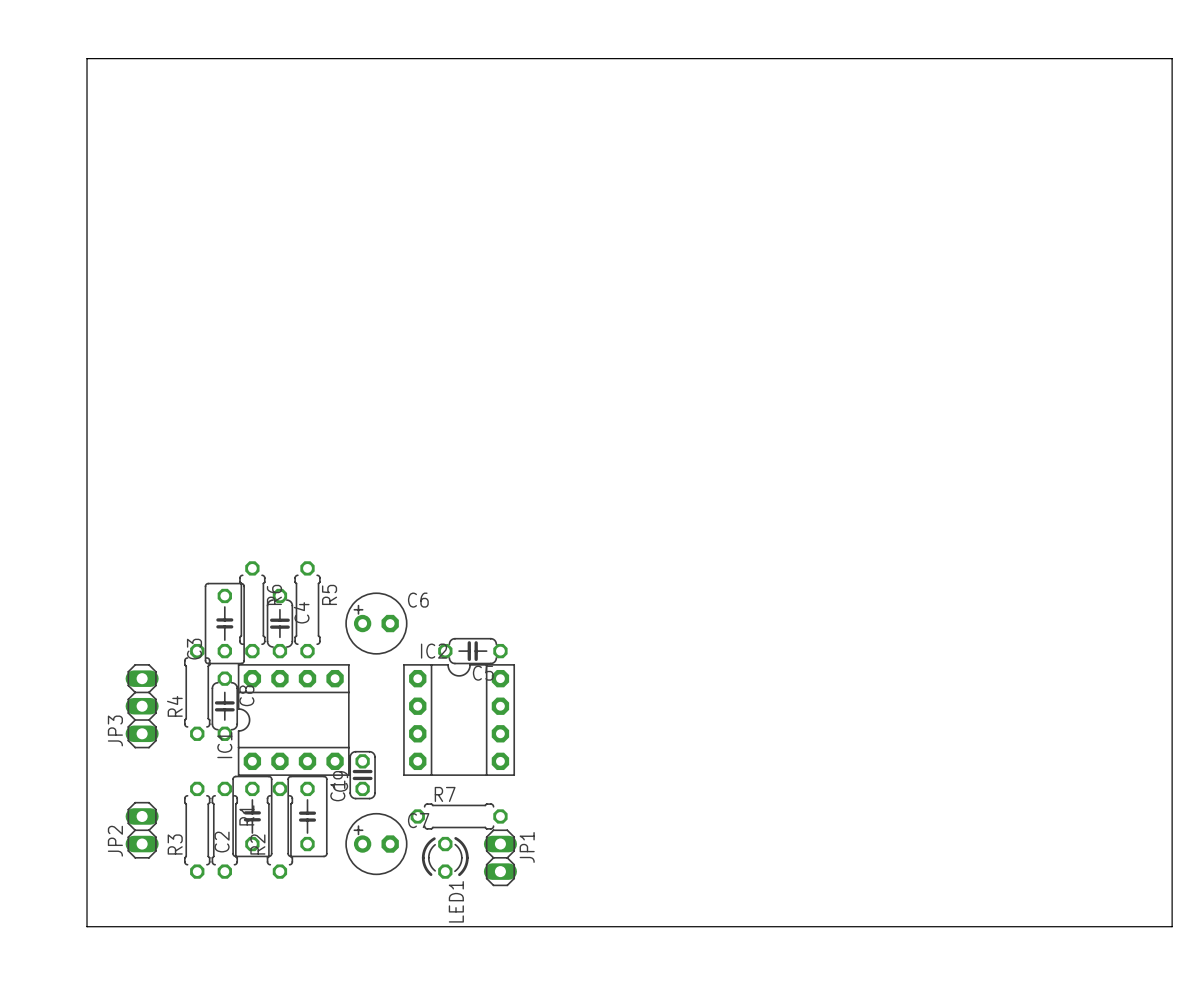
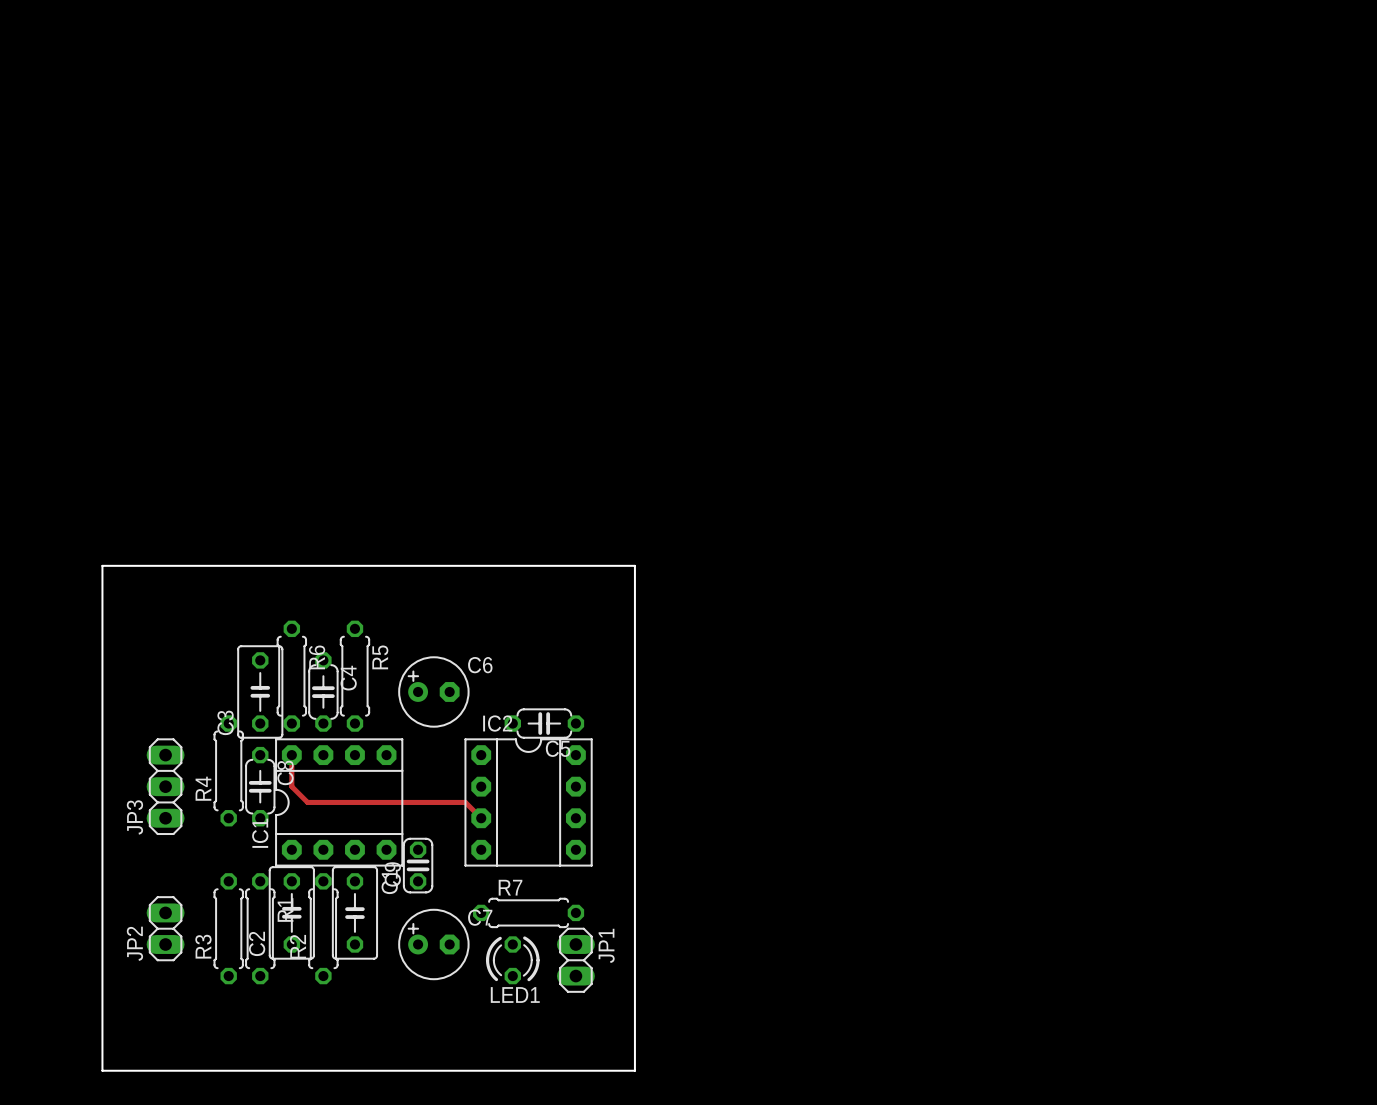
board edge: (87, 513) (87, 58) (1172, 58) (1172, 926) (87, 926) -> (102, 565) (634, 565) (634, 1070) (102, 1070) (102, 1039)
track: none -> (291, 755) (291, 786) (307, 802) (465, 802) (481, 818)
LED1 name rotation: 0° (456, 901) -> 90° clockwise (515, 994)

